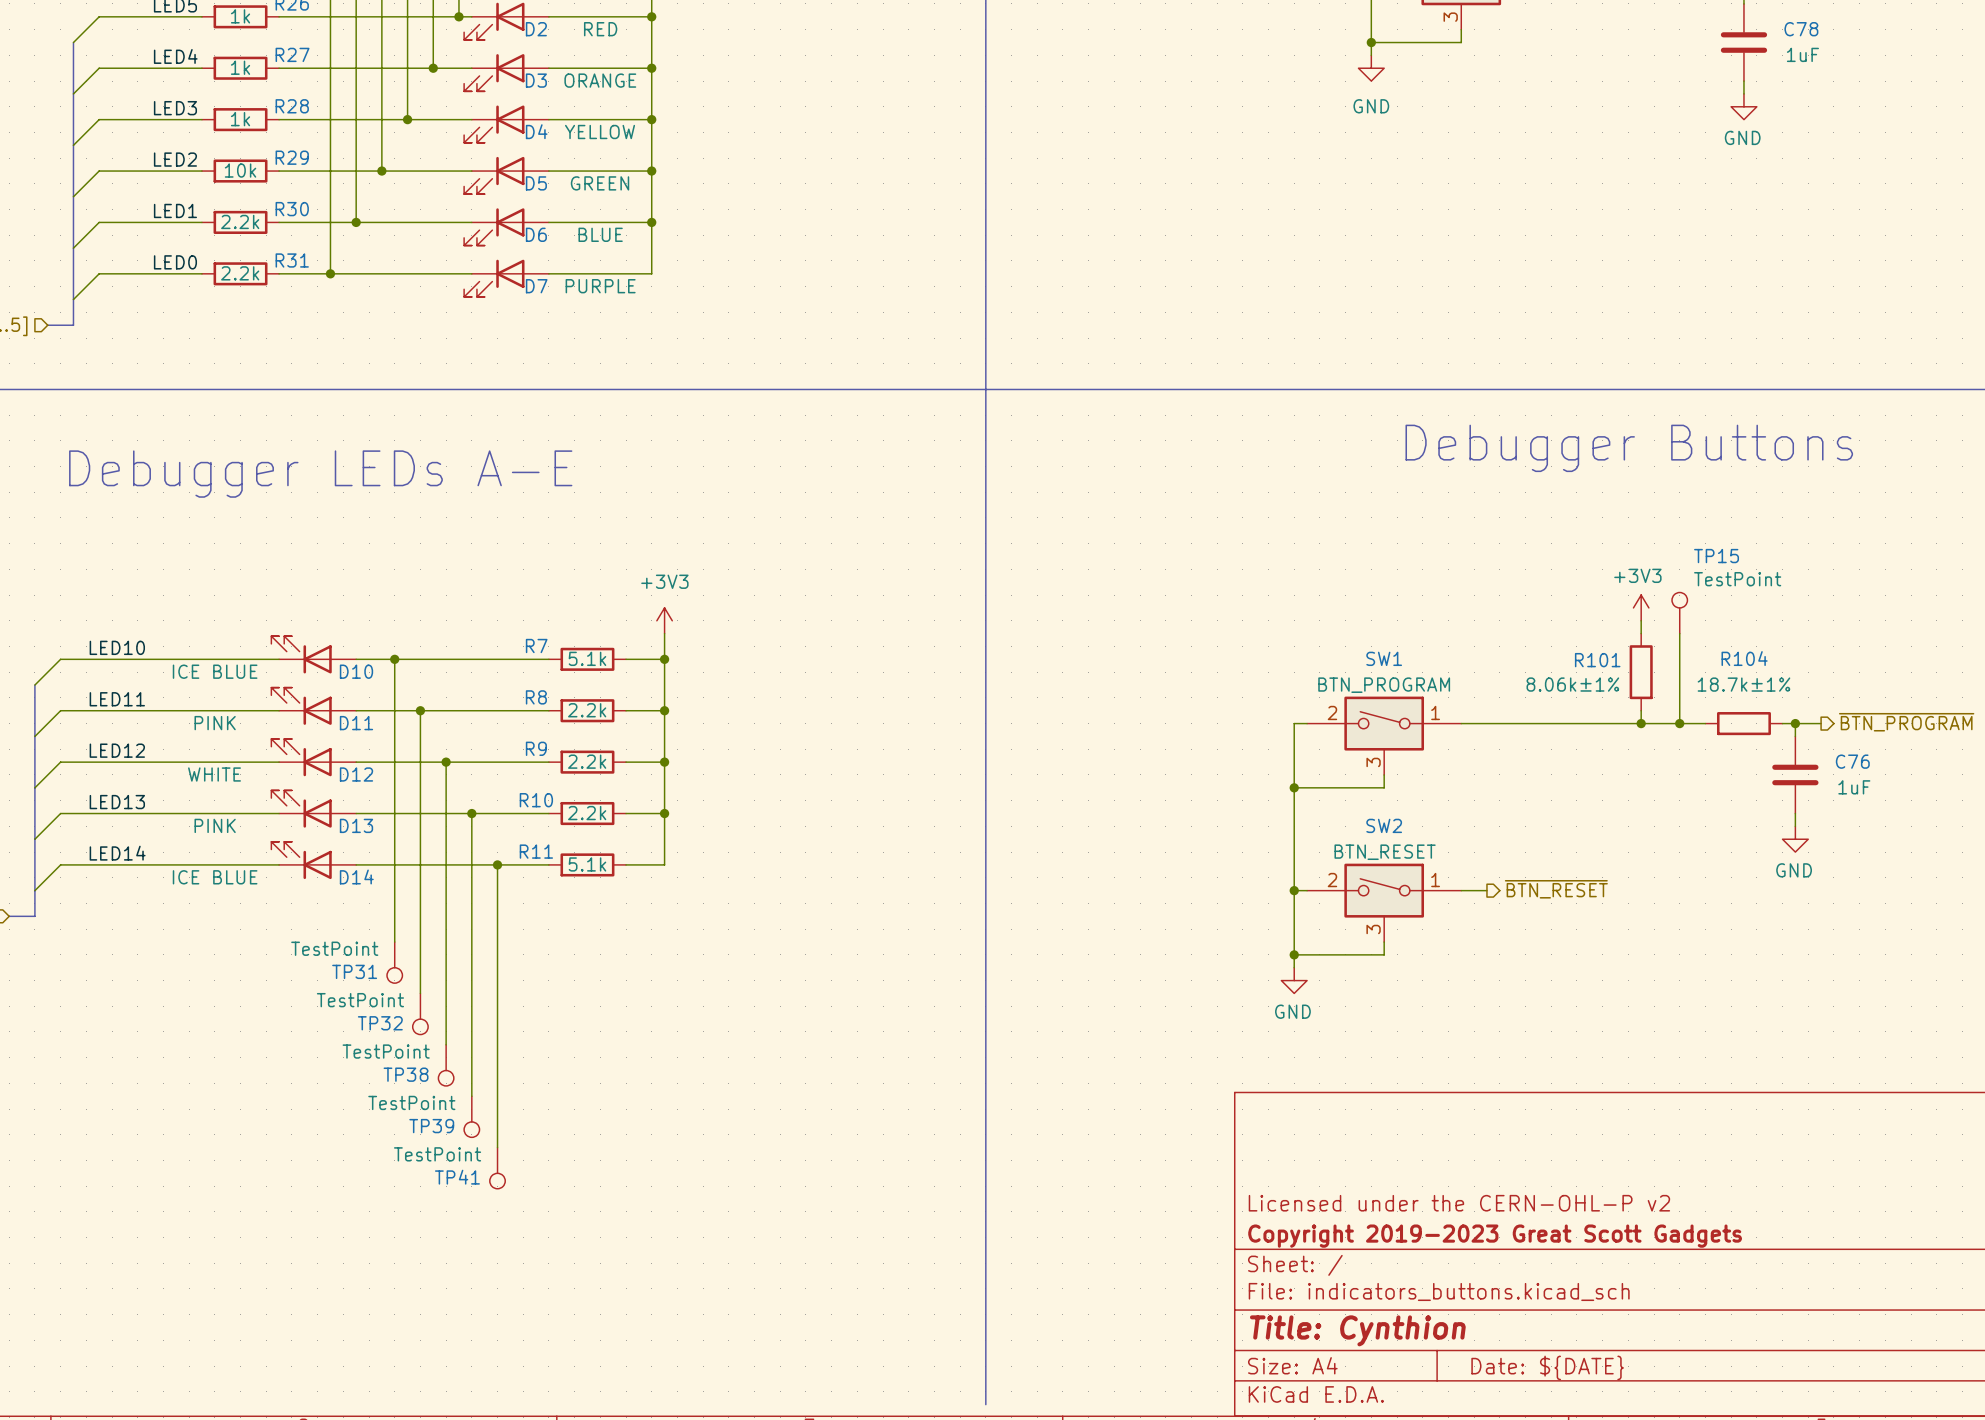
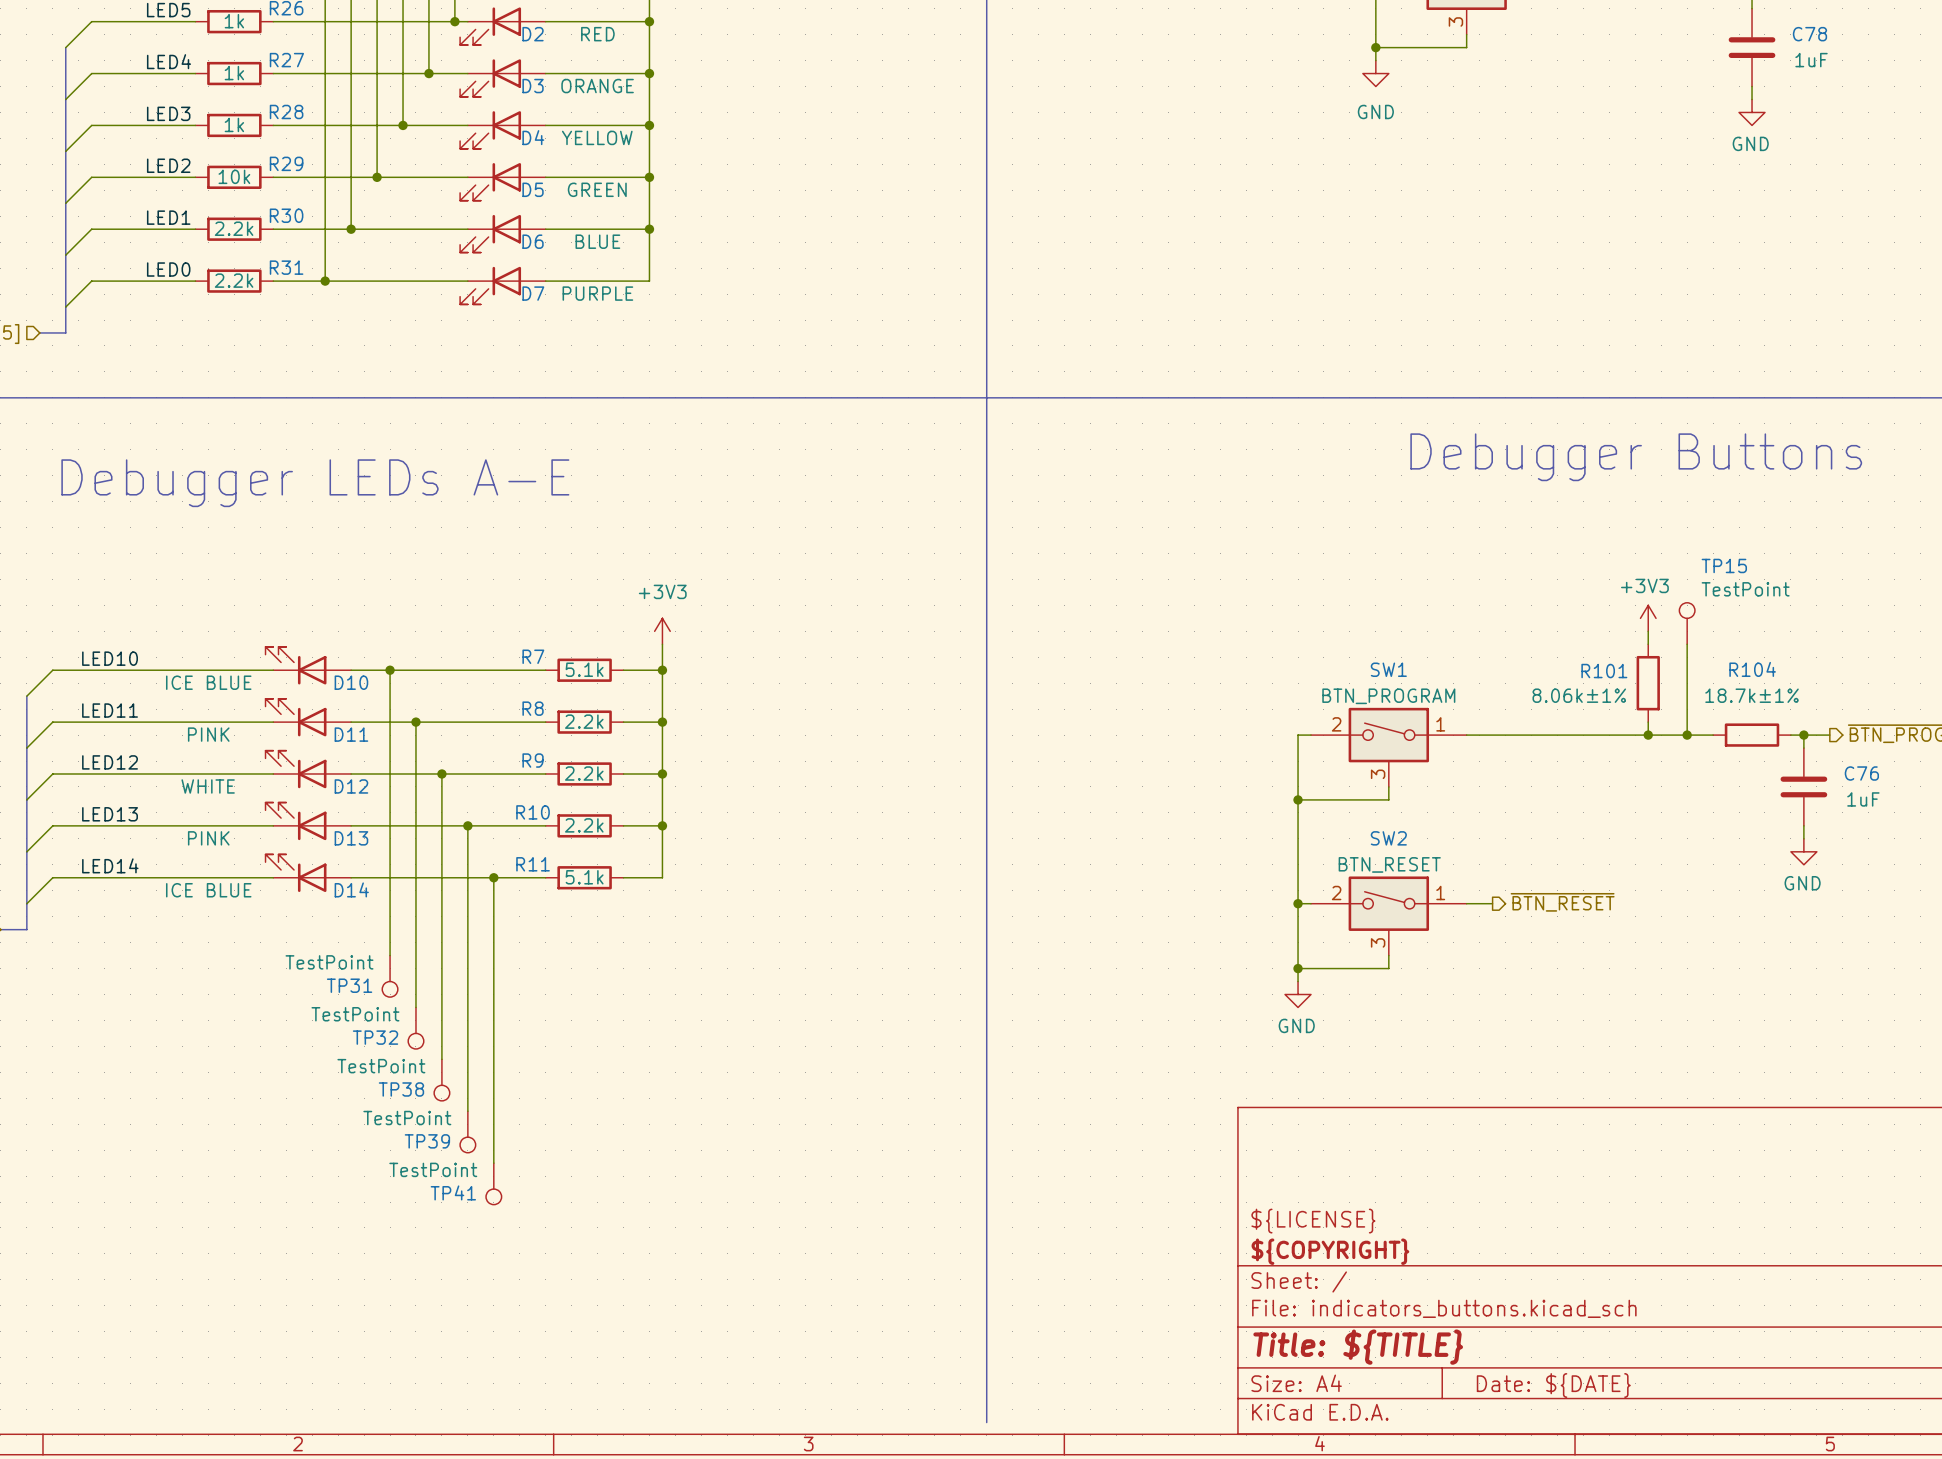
title block: Licensed under the CERN-OHL-P v2 (1459, 1203) -> ${LICENSE} (1313, 1221)
title block: Copyright 2019-2023 Great Scott Gadgets (1495, 1236) -> ${COPYRIGHT} (1330, 1251)
title block: Title: Cynthion (1357, 1330) -> Title: ${TITLE} (1358, 1347)

